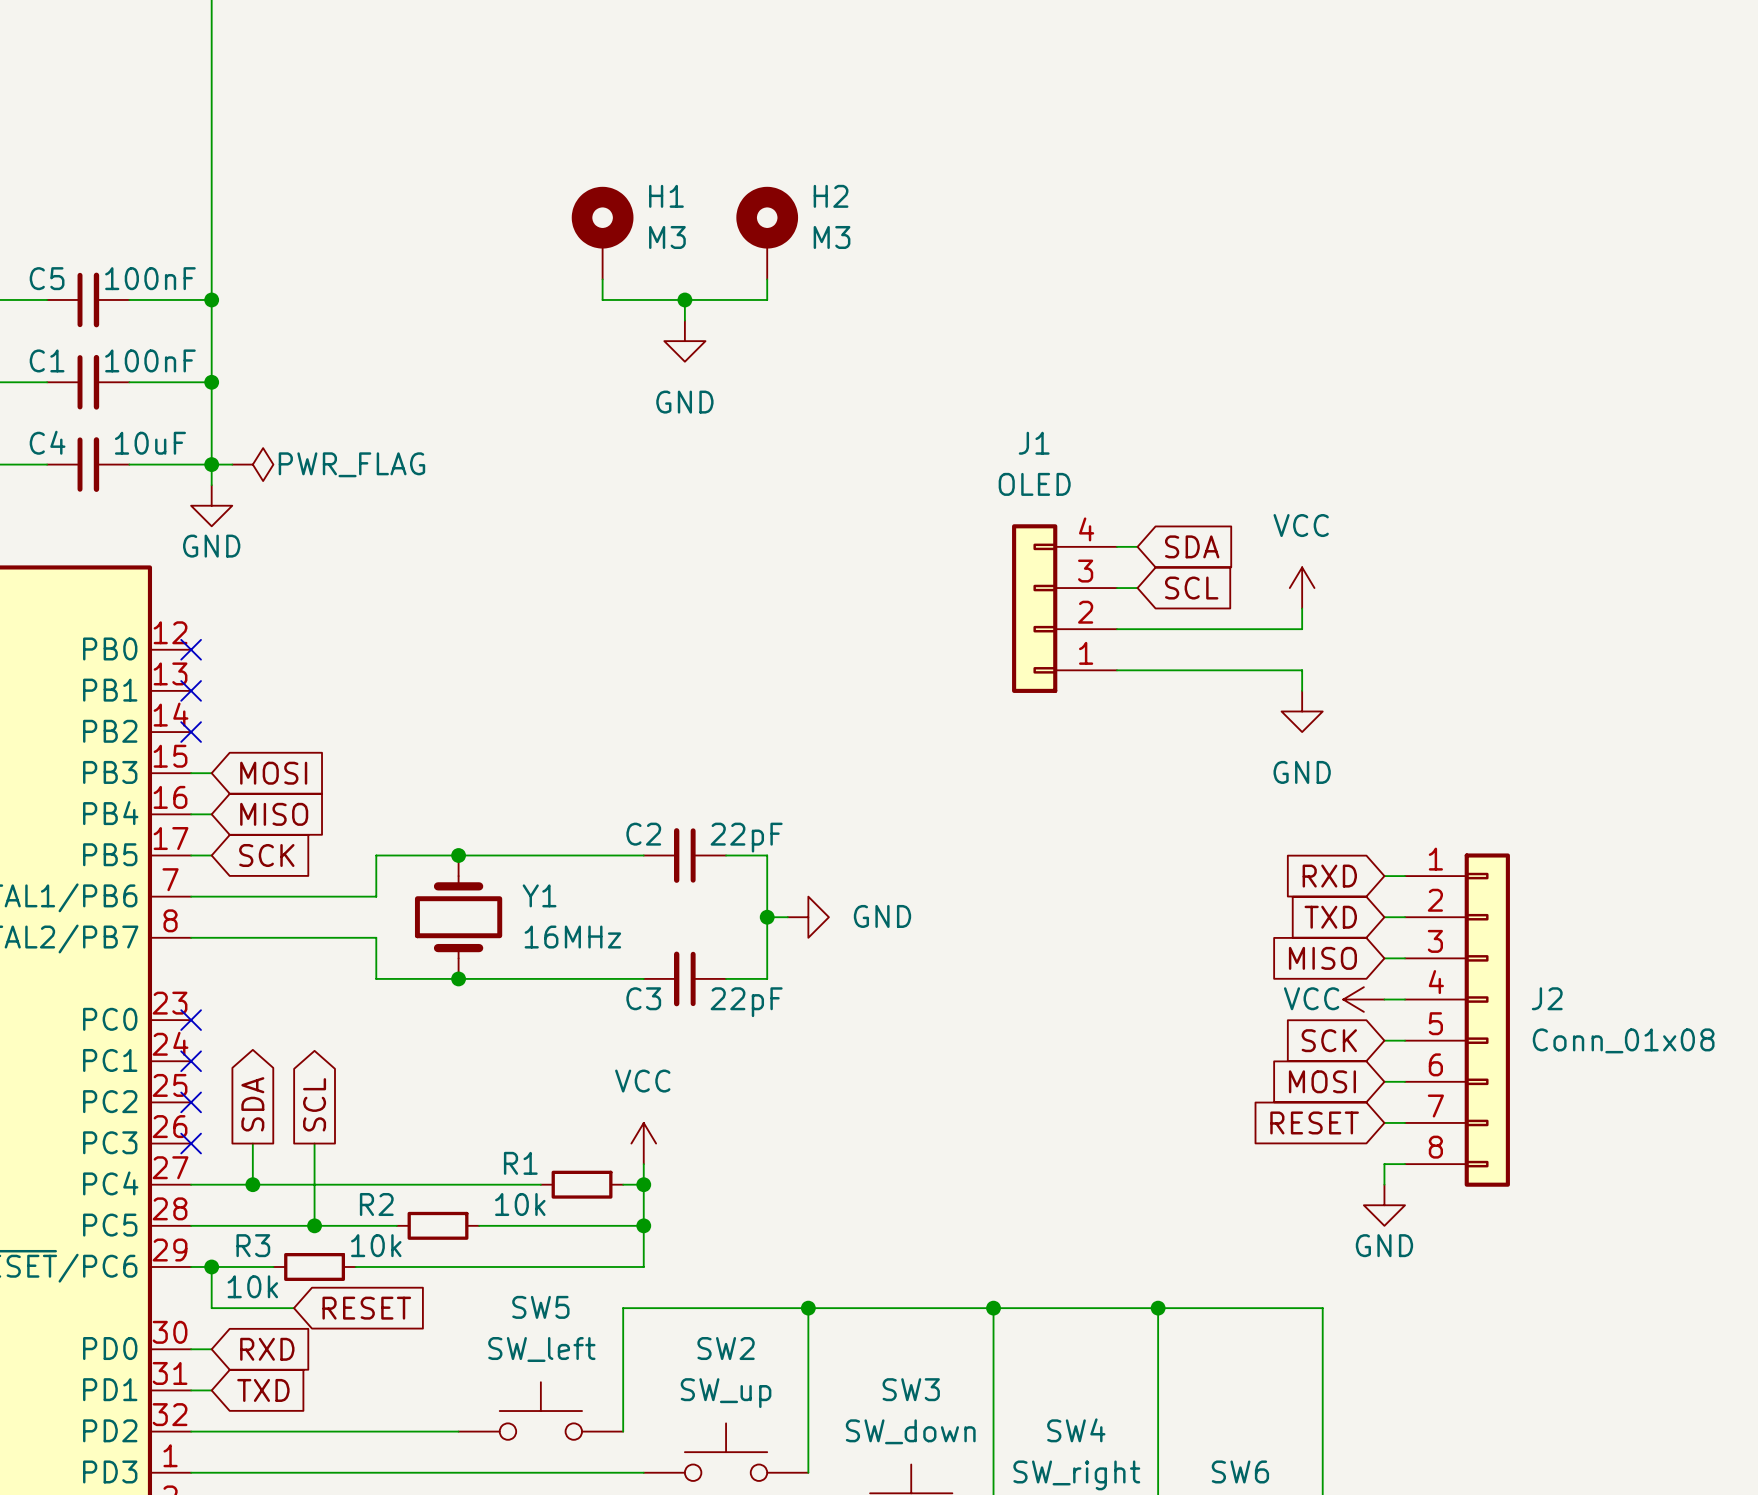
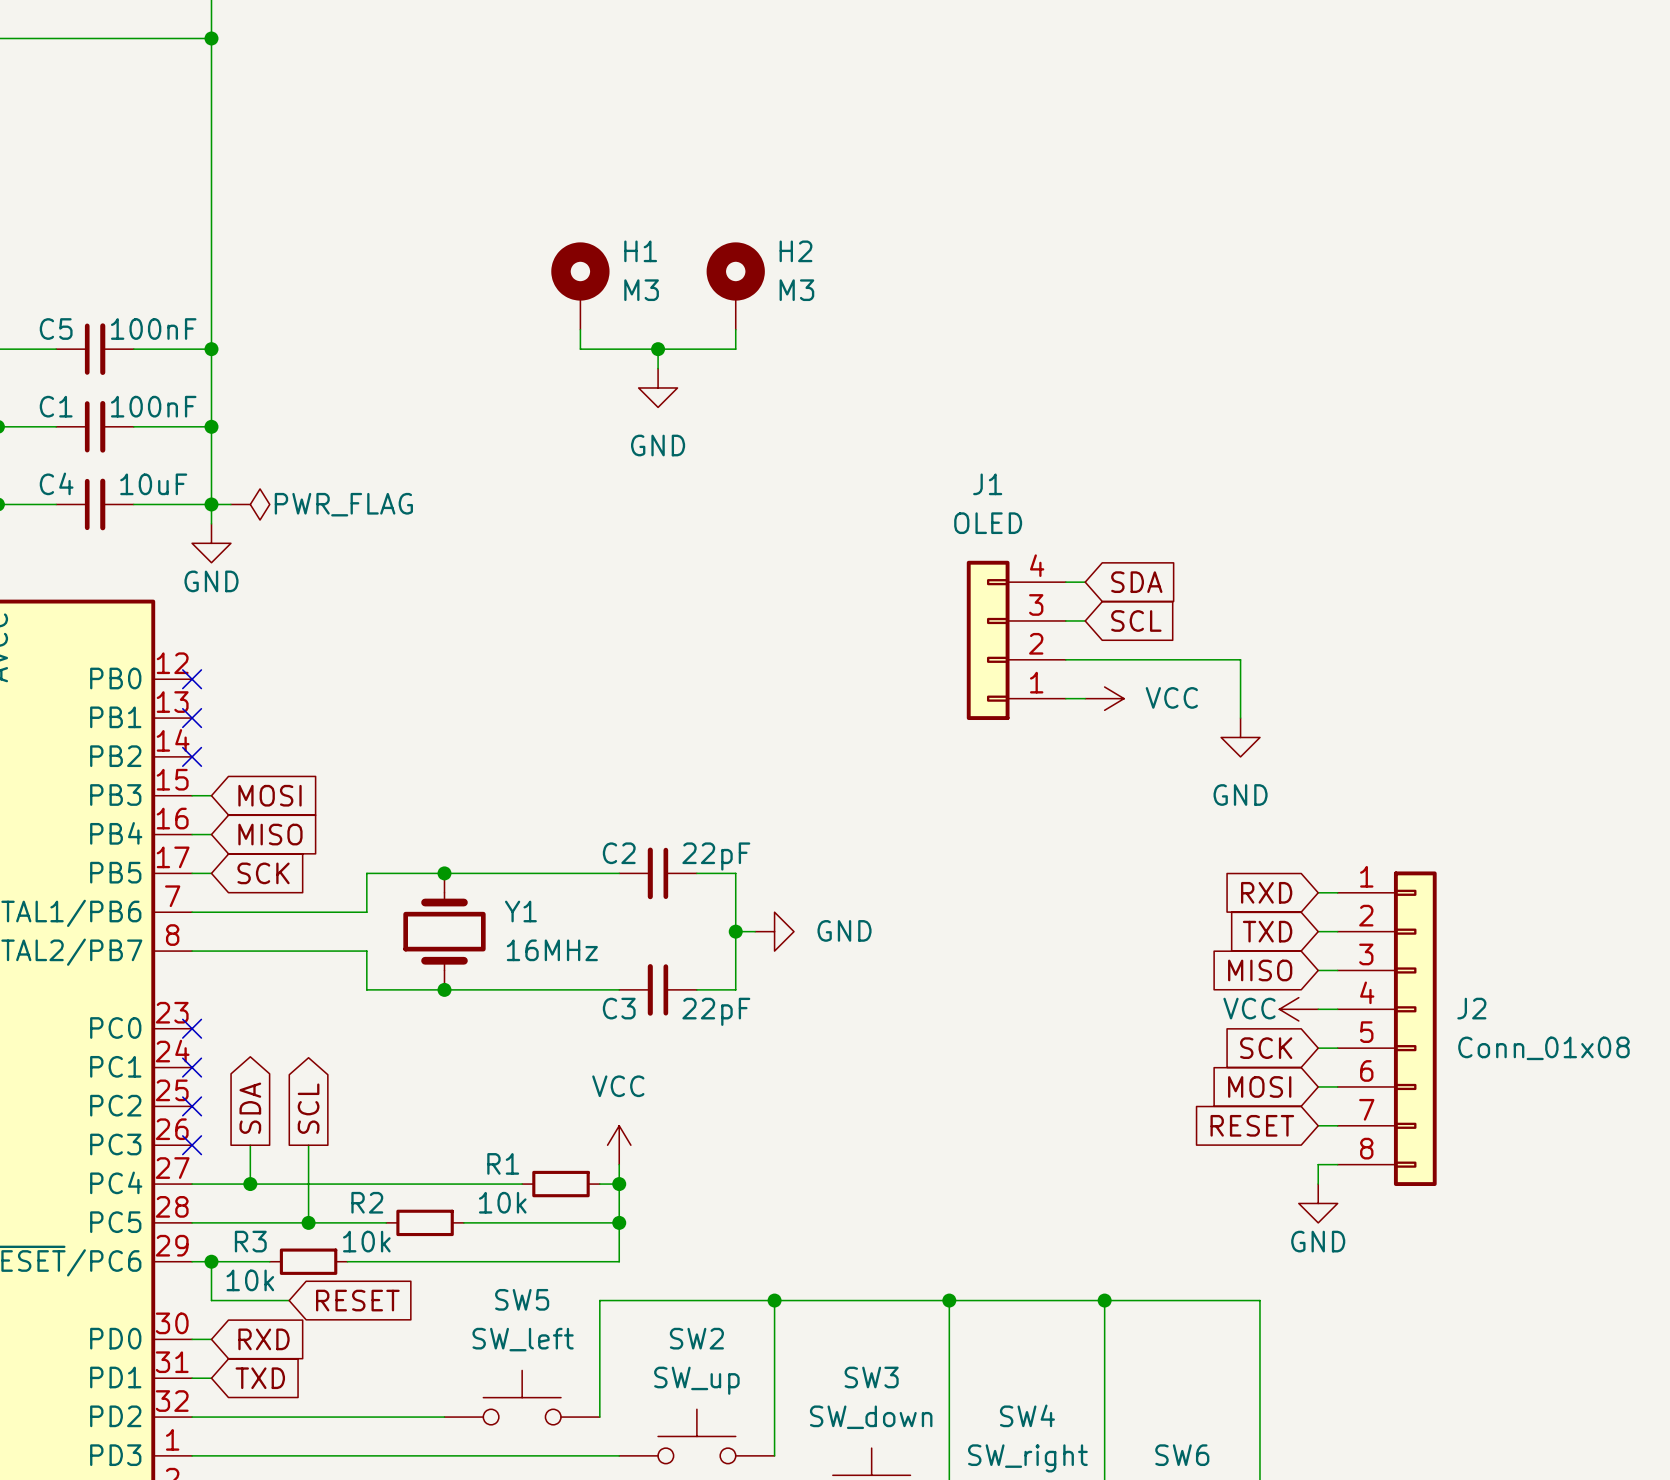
power symbol rotation: 0° (1302, 588) -> 90° clockwise (1104, 698)
power symbol position: VCC (1302, 588) -> VCC (1104, 698)
wire: (1302, 608) (1302, 629) -> (1240, 698) (1240, 659)
wire: (1137, 670) (1302, 670) -> none

